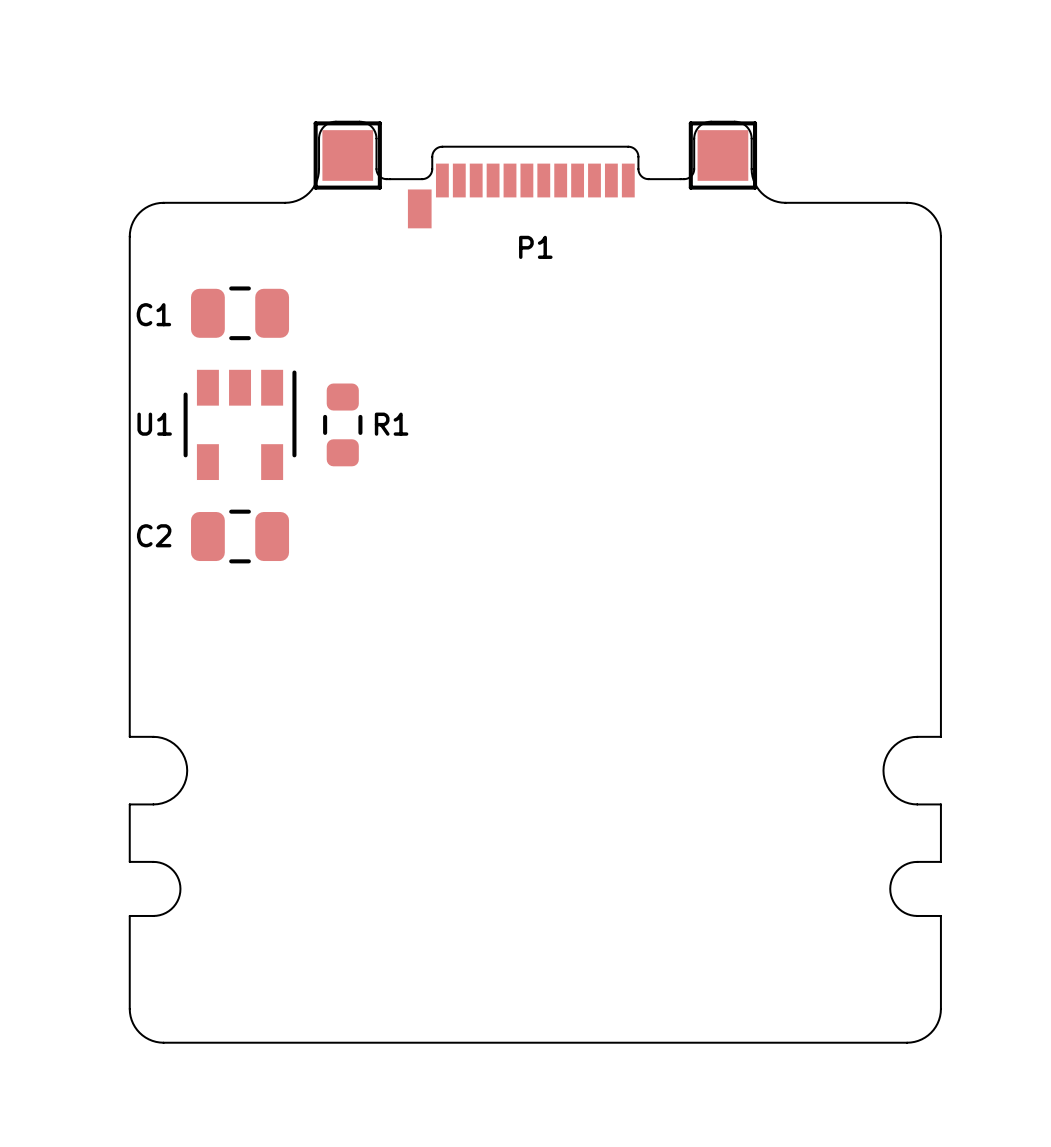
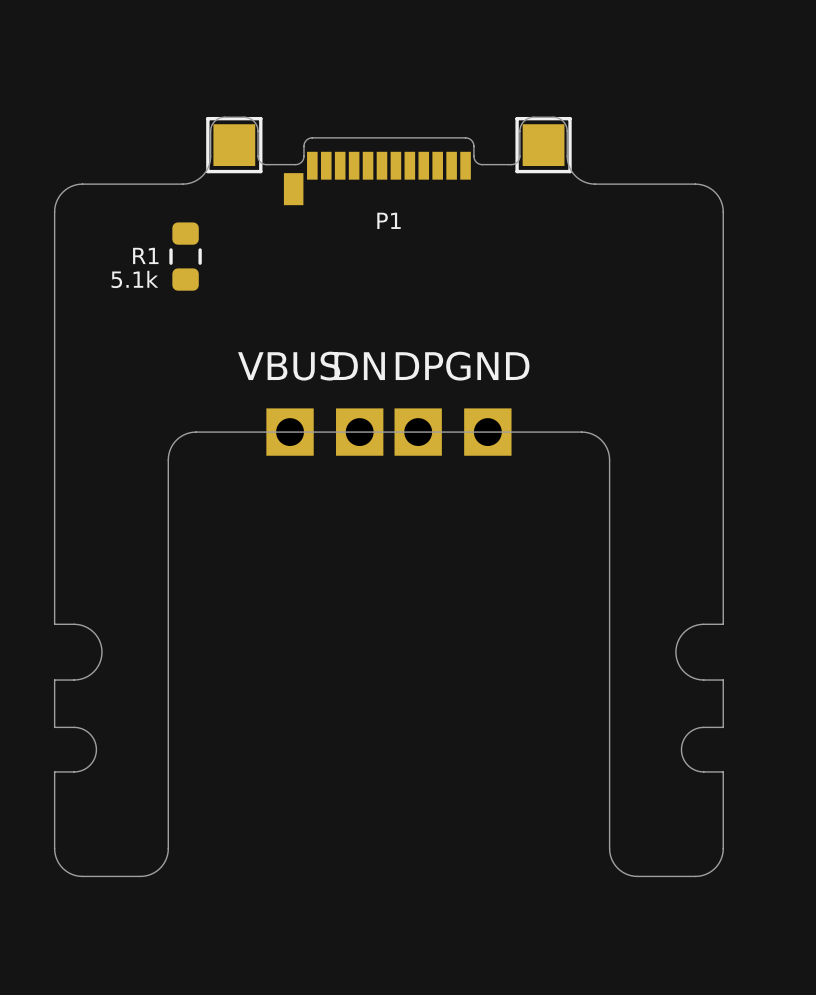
C1: (240, 313) -> none
text: none -> 5.1k (134, 279)
U1: (240, 424) -> none
R1 position: (342, 424) -> (185, 256)
R1 name position: R1 (391, 424) -> R1 (145, 255)
VBUS: none -> (290, 432)
DN: none -> (359, 432)
DP: none -> (418, 432)
GND: none -> (487, 432)
C2: (240, 536) -> none
board edge: (233, 1042) (836, 1042) -> (140, 876) (149, 874) (160, 868) (165, 860) (168, 851) (168, 456) (171, 447) (176, 440) (184, 434) (196, 432) (581, 432) (593, 434) (601, 440) (606, 447) (609, 459) (609, 851) (612, 860) (620, 870) (628, 874) (637, 876)

